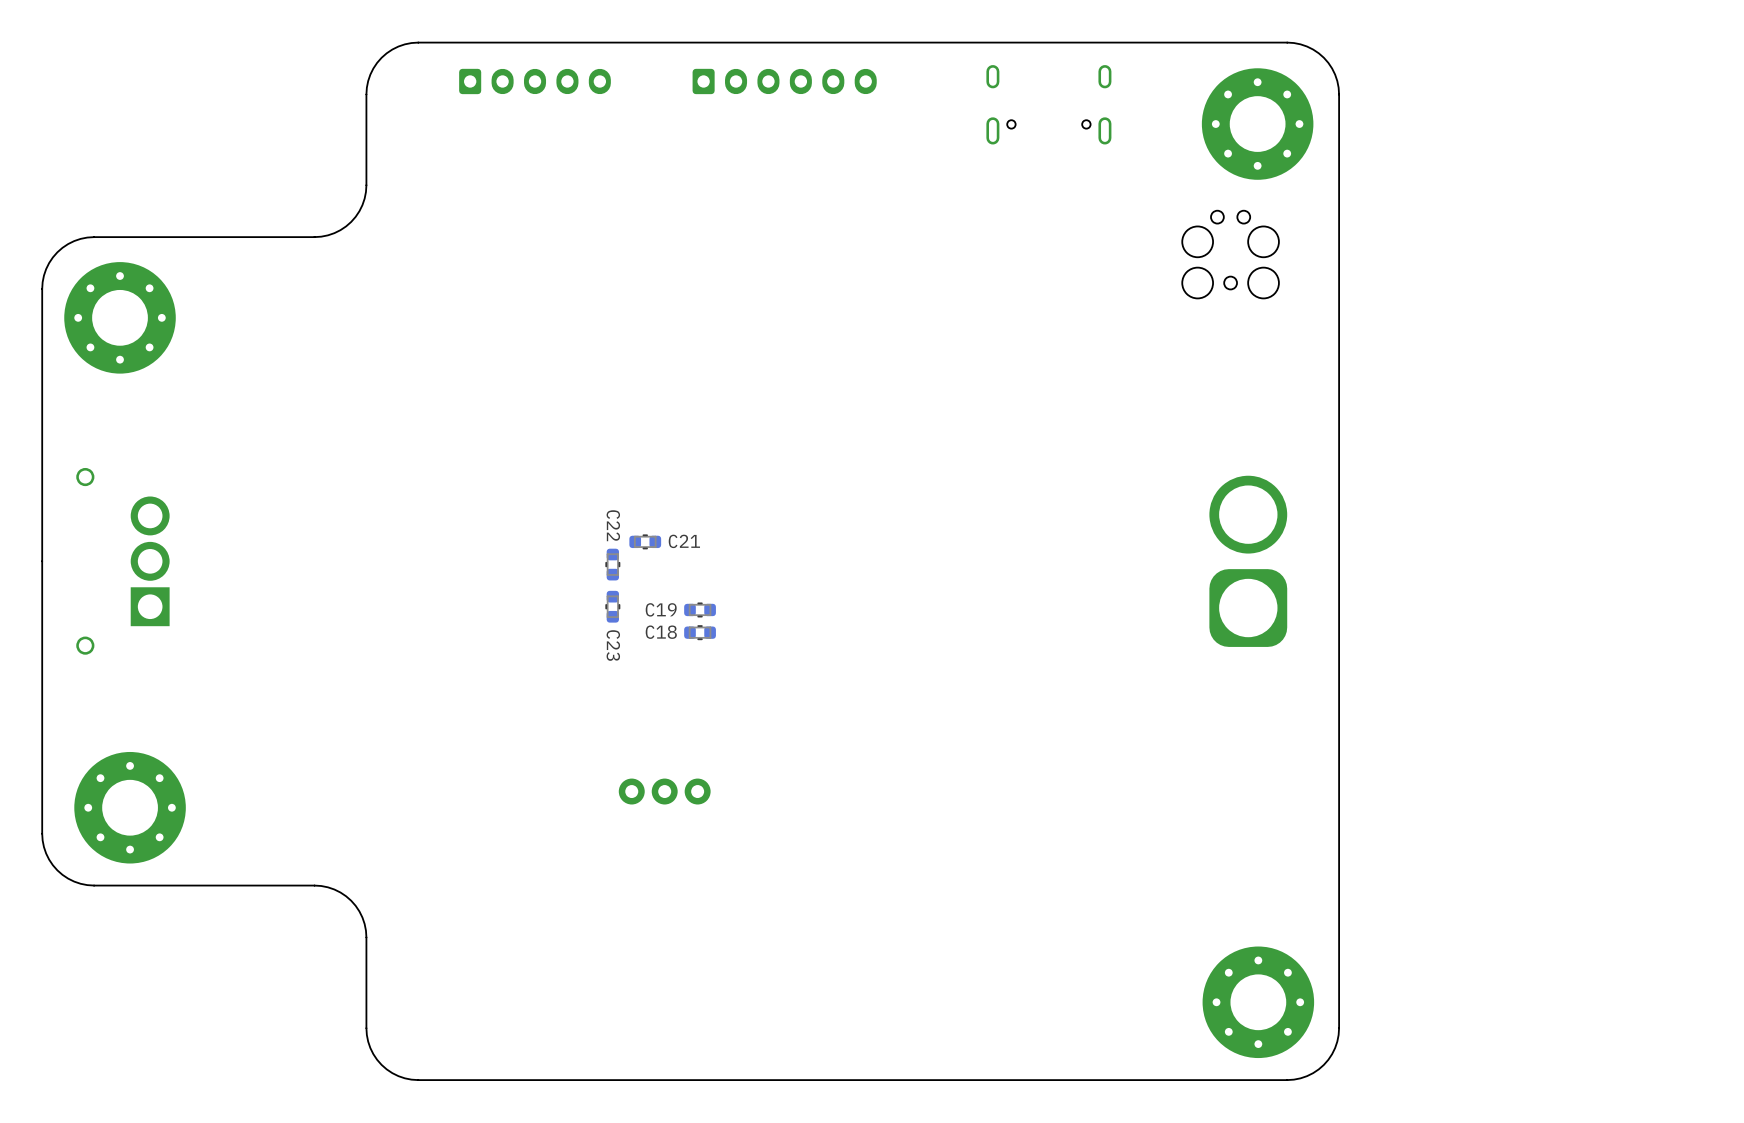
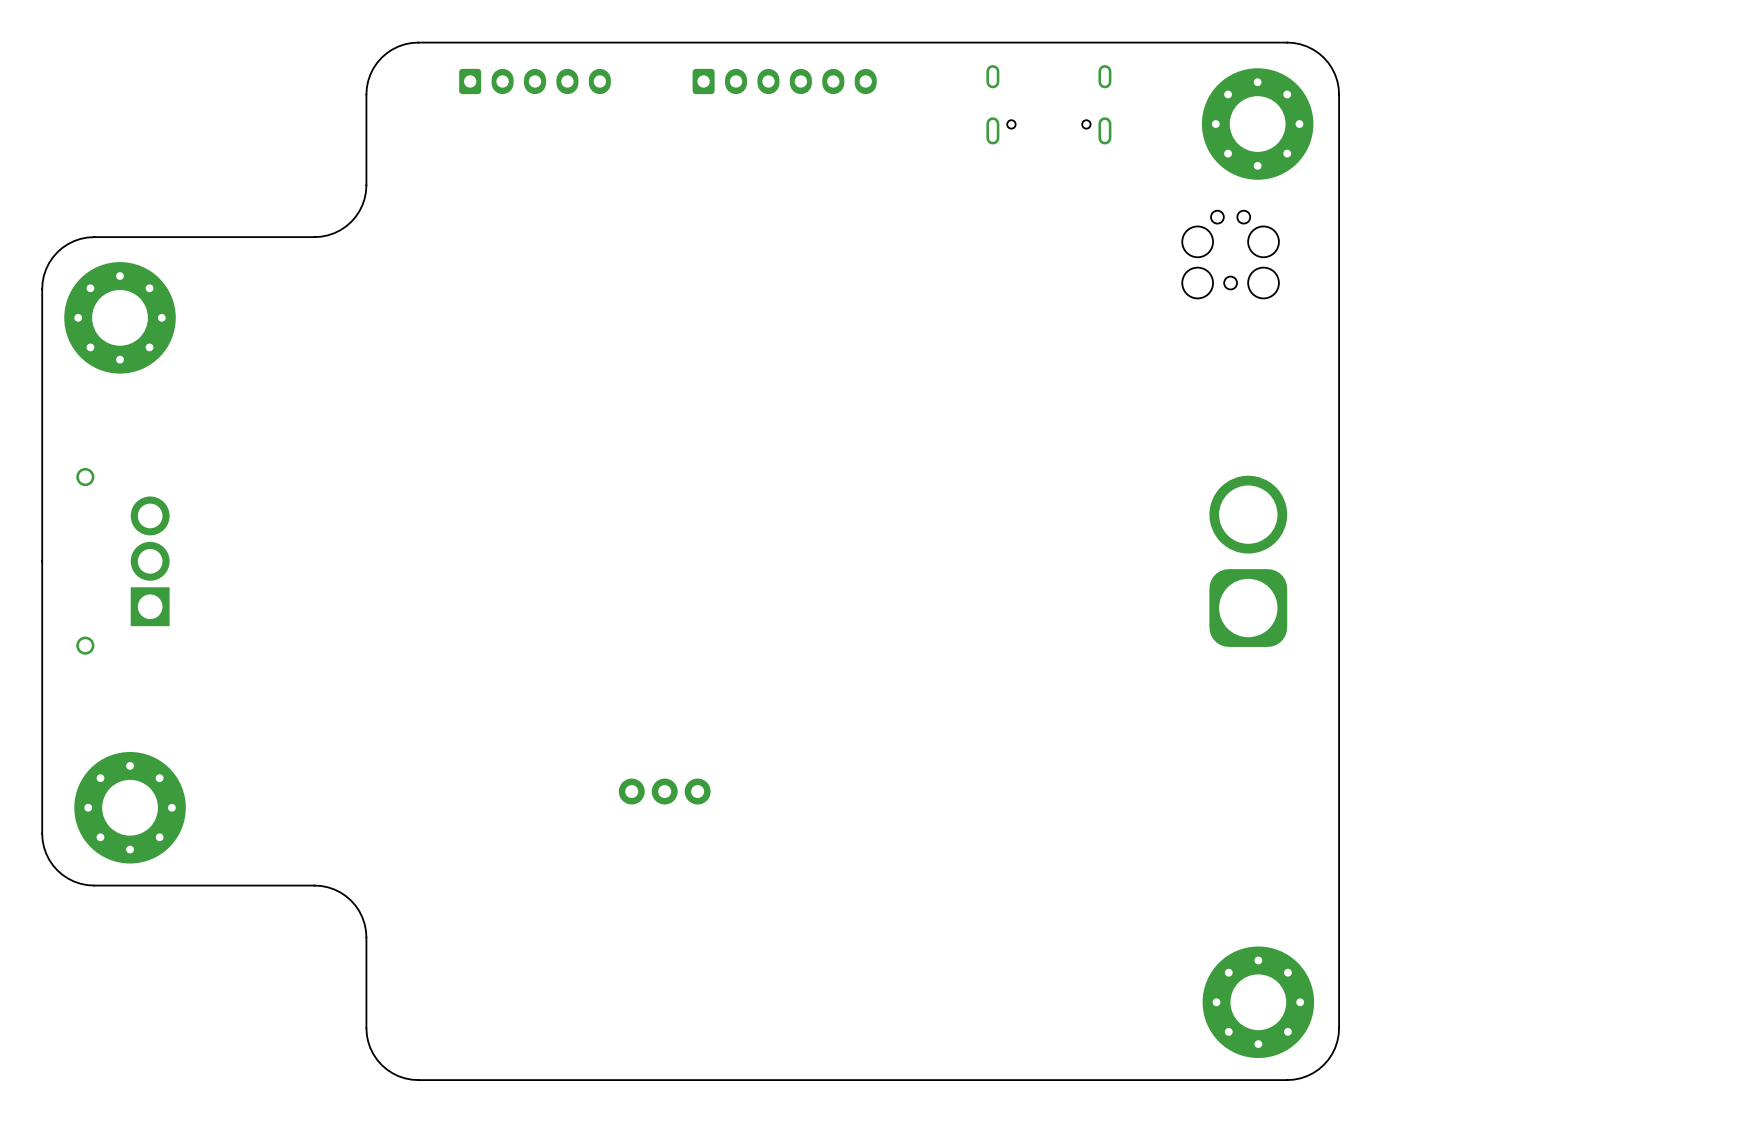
C21: (645, 541) -> none
C22: (612, 564) -> none
C23: (612, 606) -> none
C19: (700, 609) -> none
C18: (700, 632) -> none

